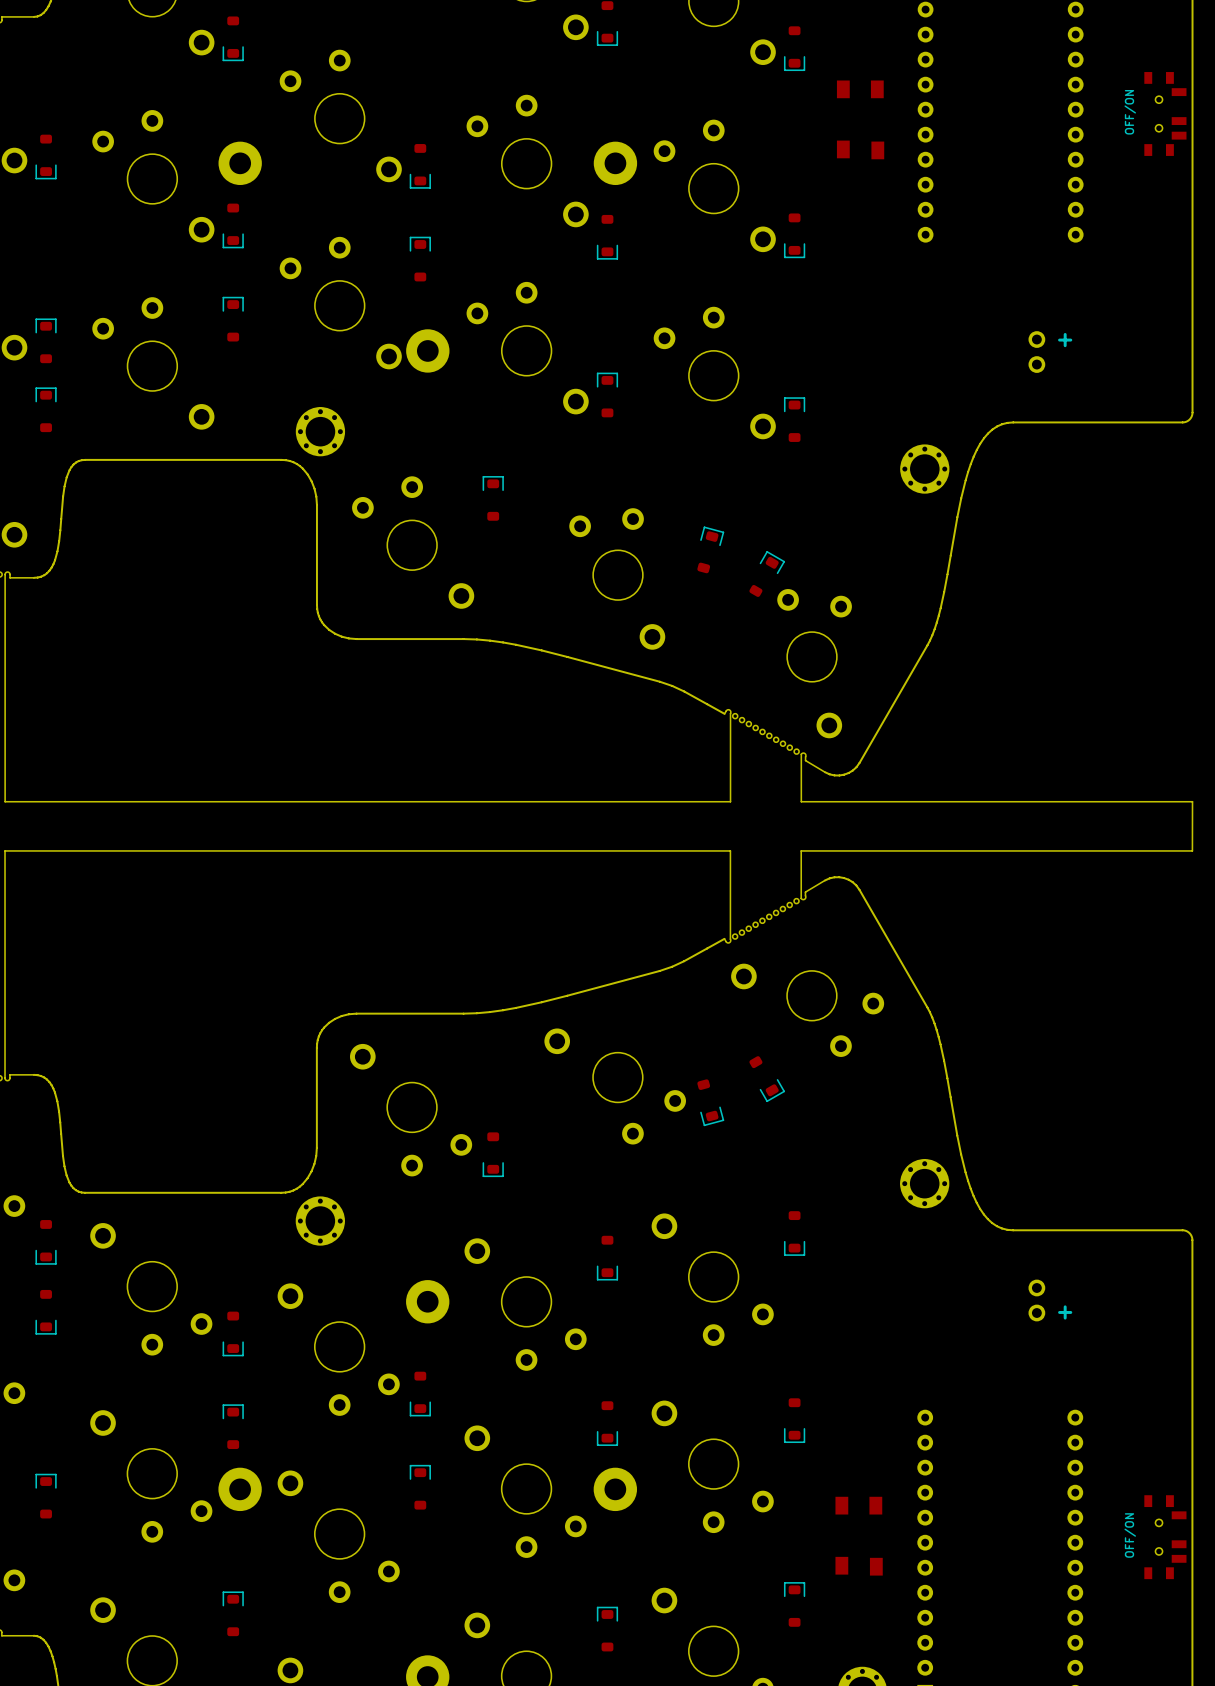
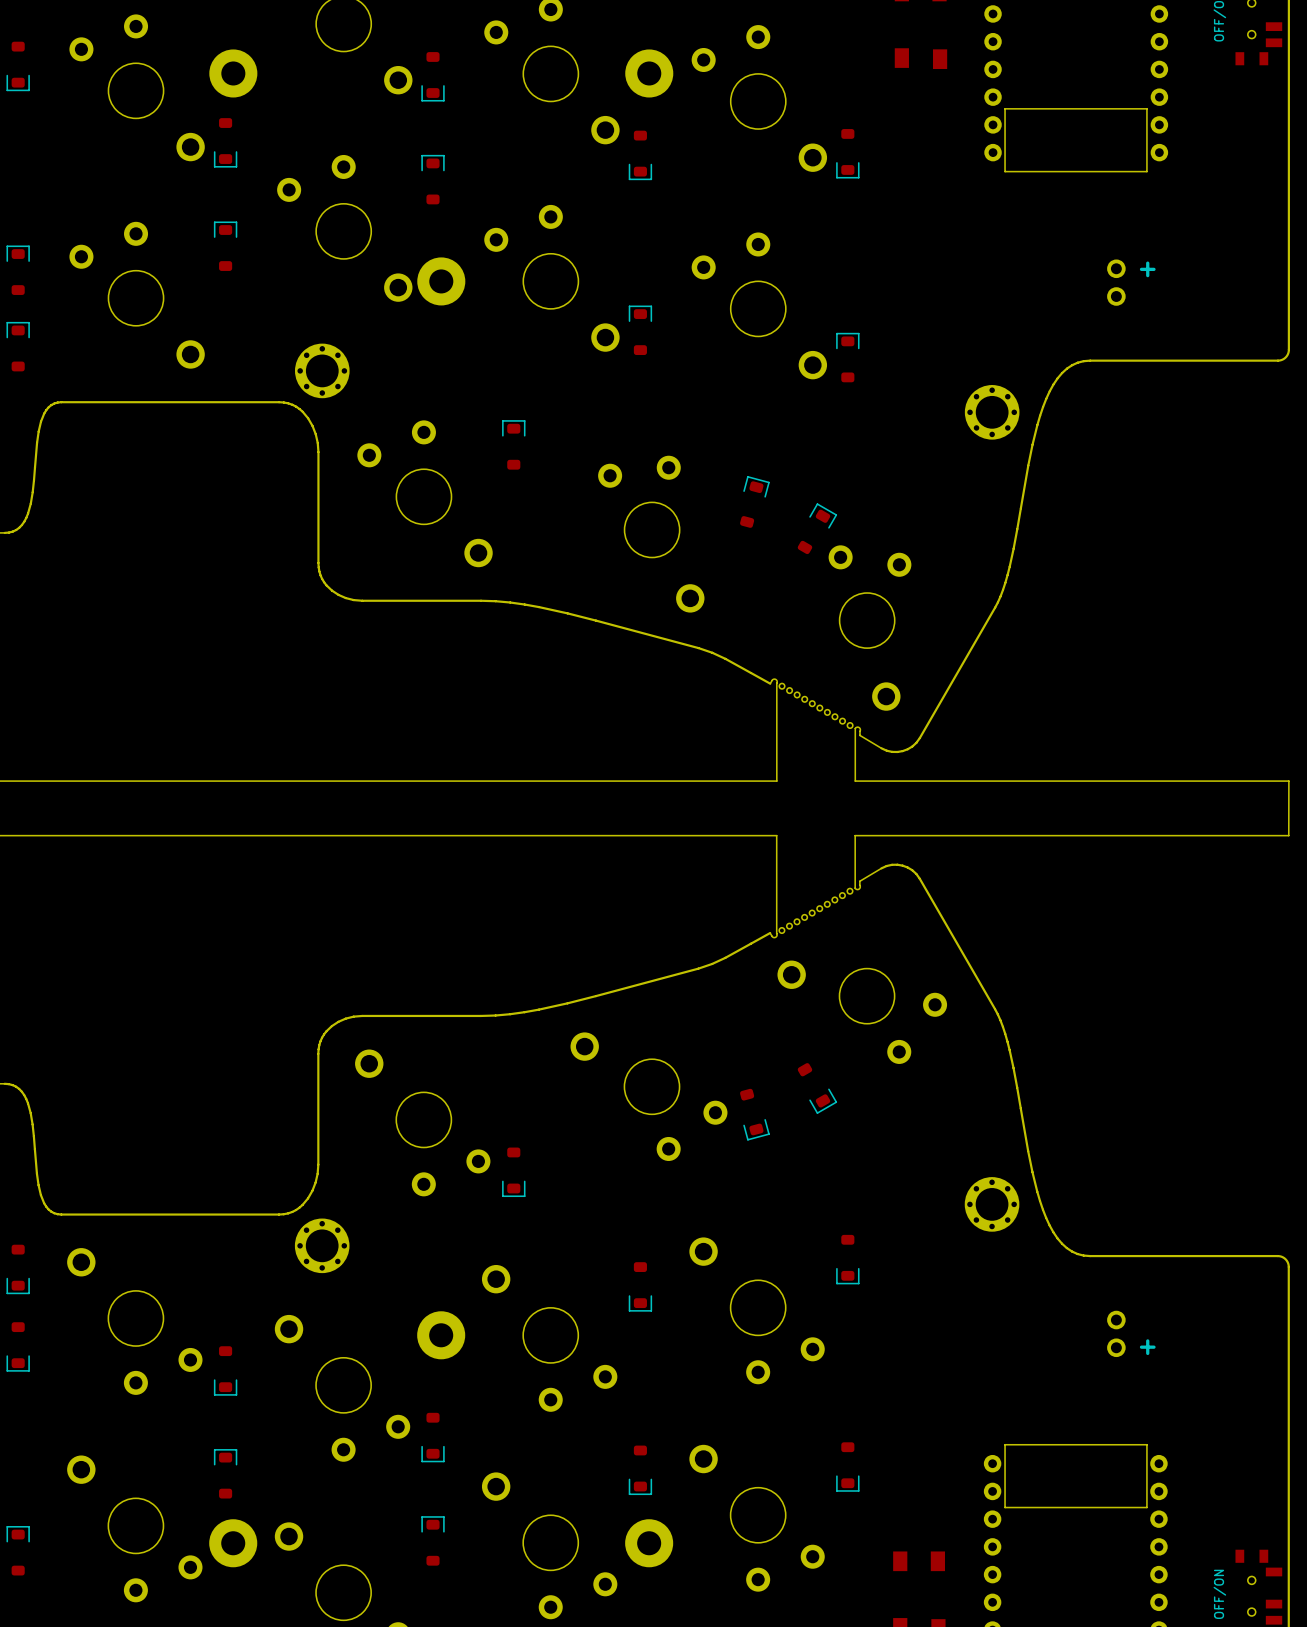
board edge: none -> (1005, 108) (1005, 171) (1146, 171) (1146, 108) (1005, 108)
board edge: none -> (1005, 1444) (1146, 1444) (1146, 1507) (1005, 1507) (1005, 1444)

